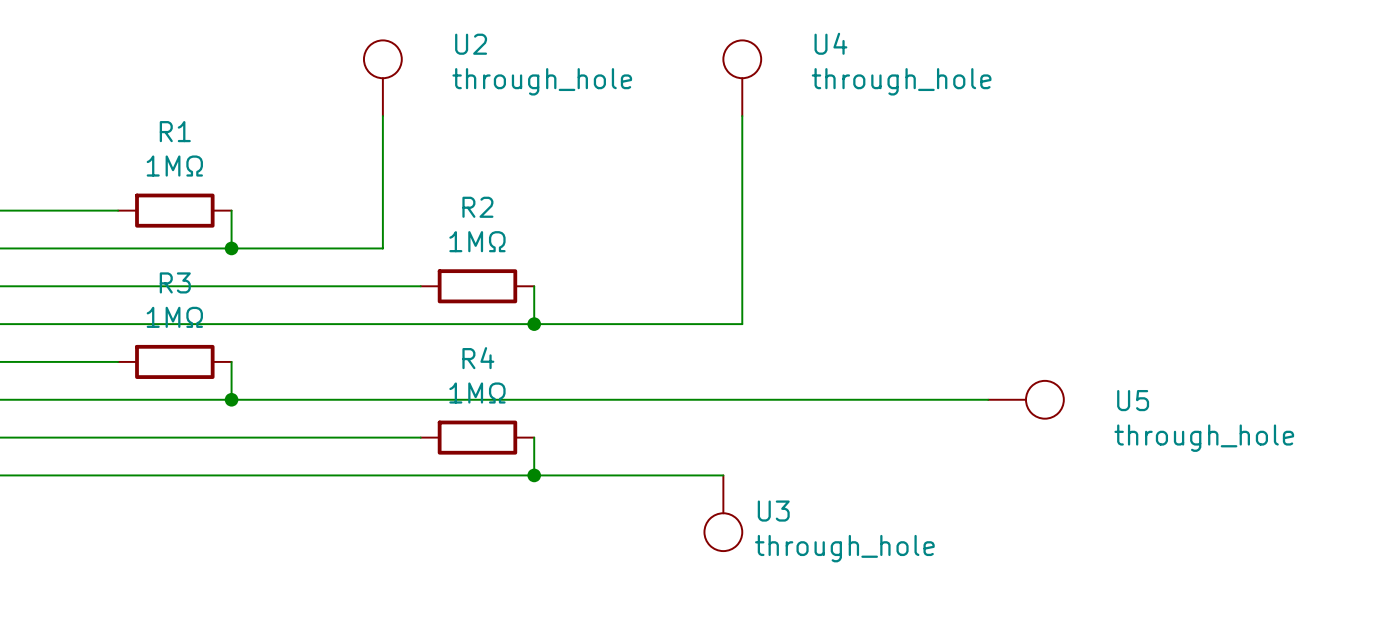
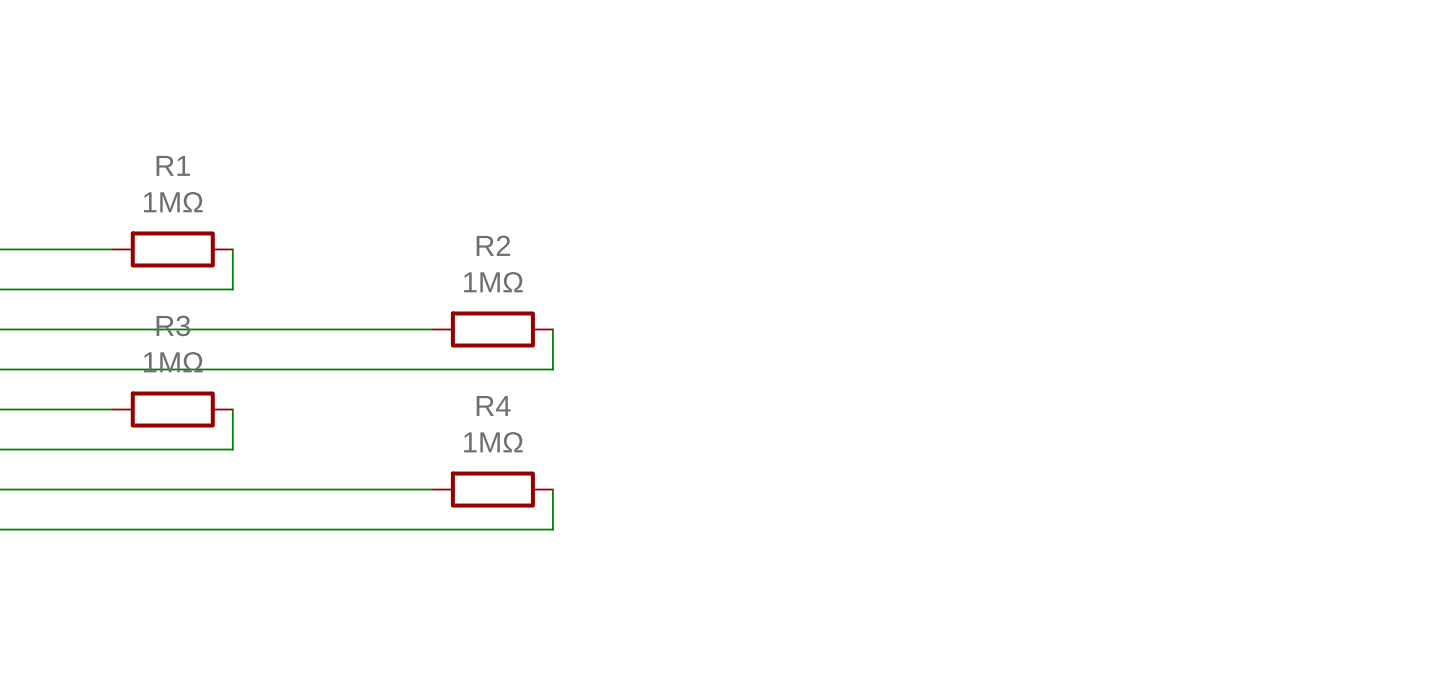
U2: through_hole (382, 78) -> none
U4: through_hole (742, 78) -> none
wire: (382, 116) (382, 248) (231, 248) -> none
wire: (742, 116) (742, 324) (534, 324) -> none
junction: (231, 248) -> none
junction: (534, 324) -> none
wire: (231, 399) (988, 399) -> none
junction: (231, 399) -> none
U5: through_hole (1026, 399) -> none
wire: (534, 475) (723, 475) -> none
junction: (534, 475) -> none
U3: through_hole (723, 513) -> none

